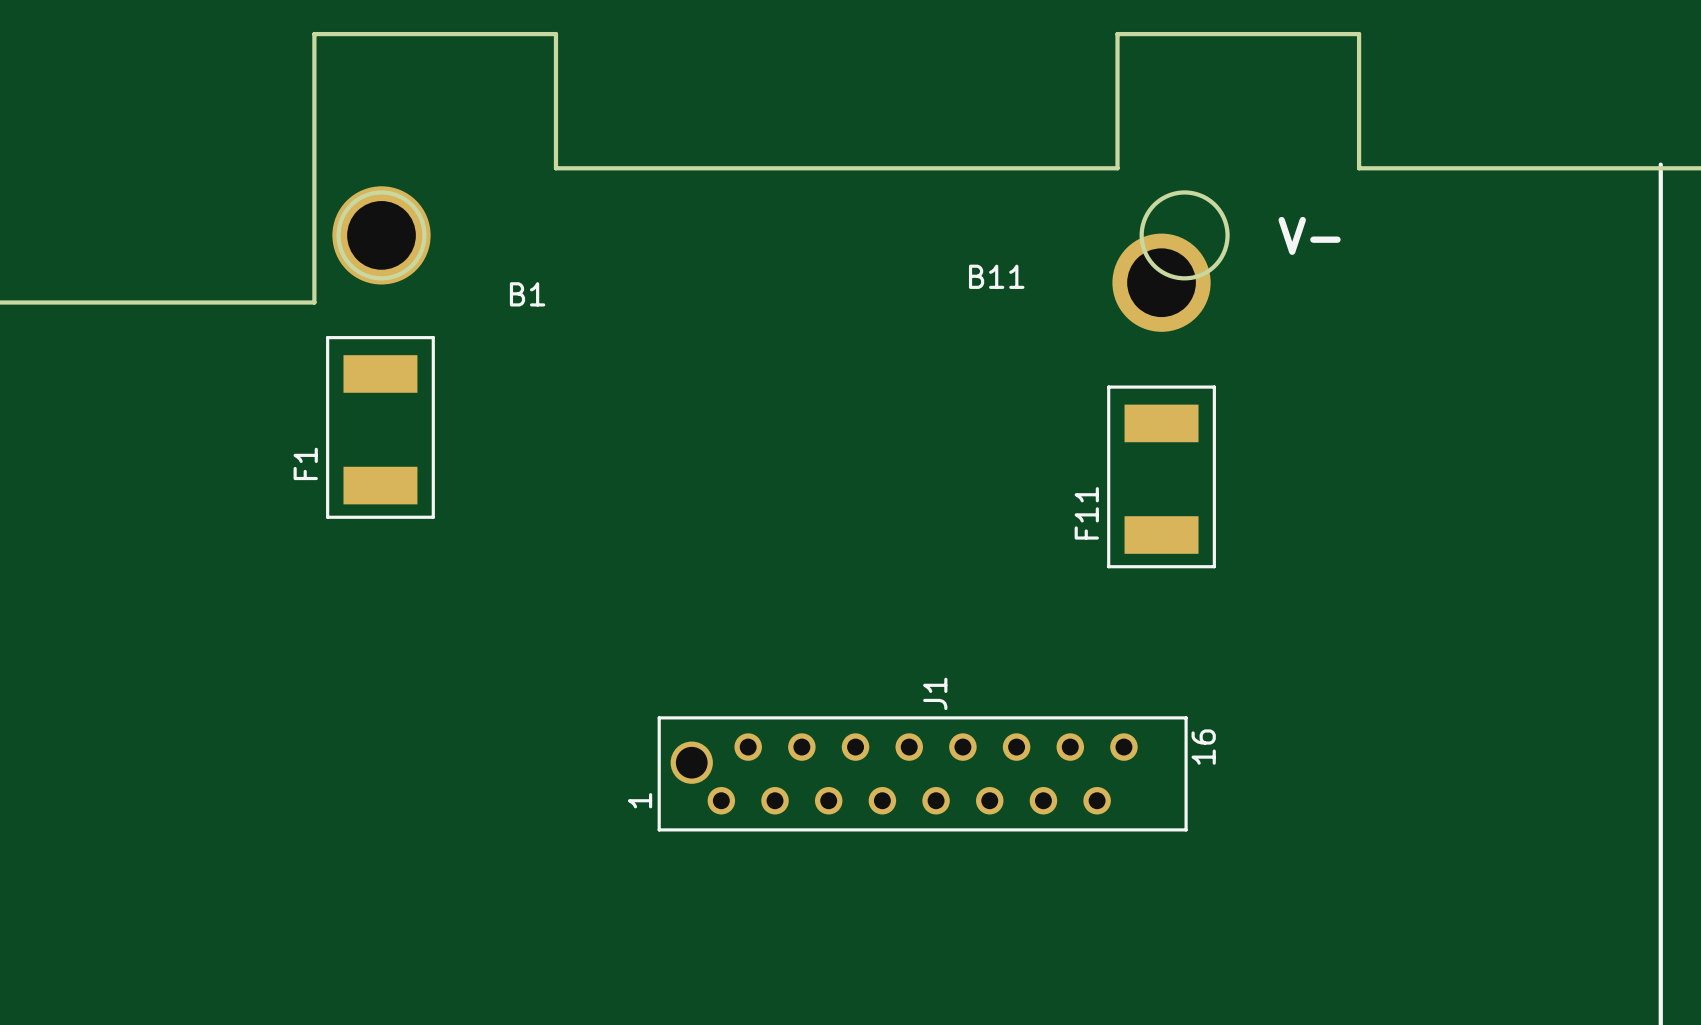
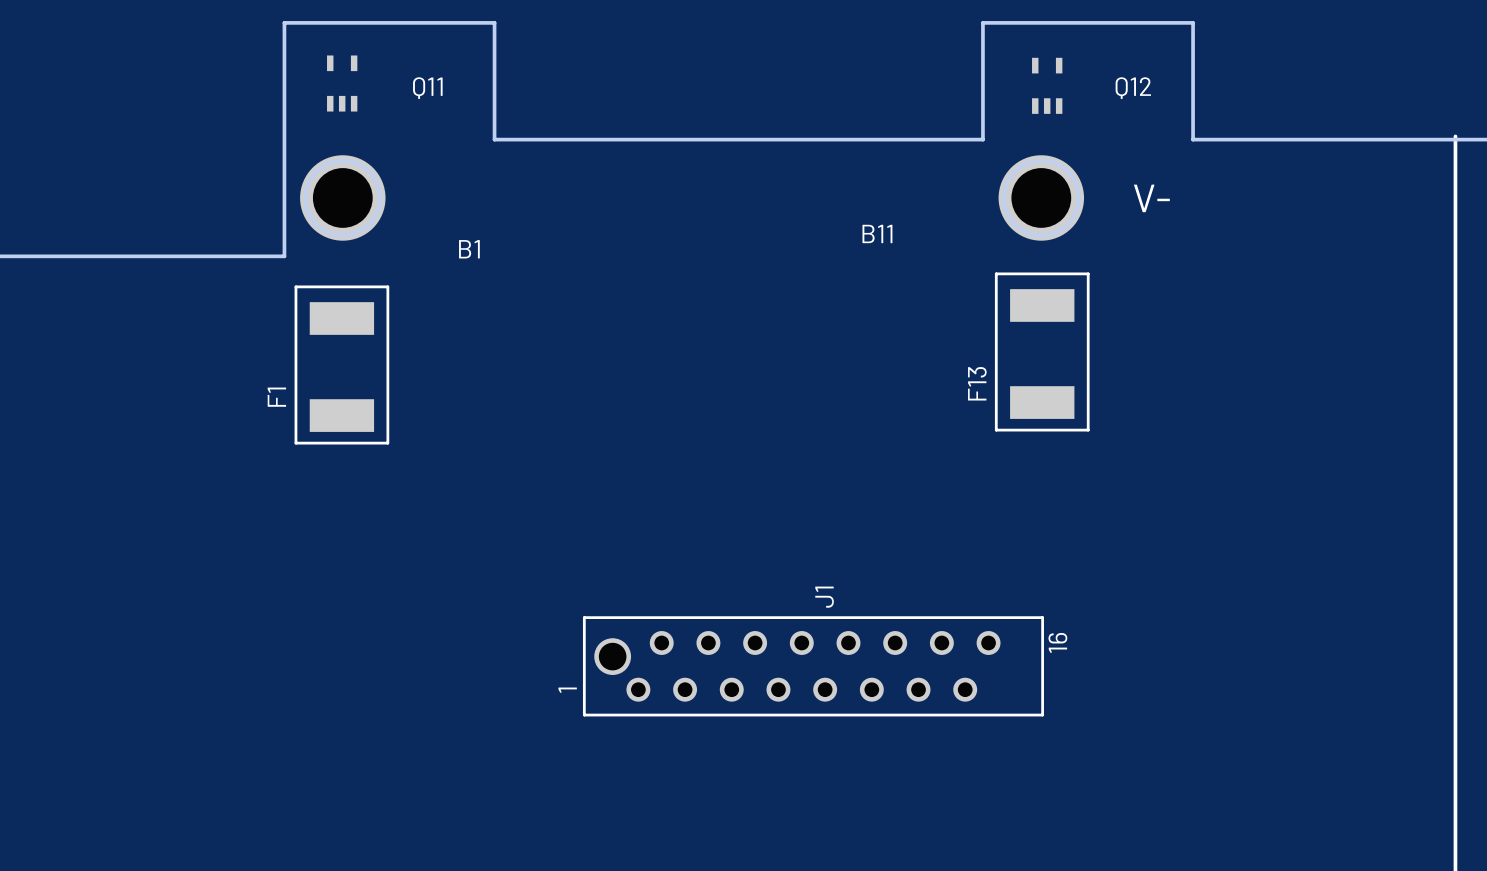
Q11: none -> (342, 83)
Q12: none -> (1047, 85)
B11 position: (1161, 282) -> (1041, 197)
F13: none -> (1042, 351)
F11: (1161, 476) -> none

